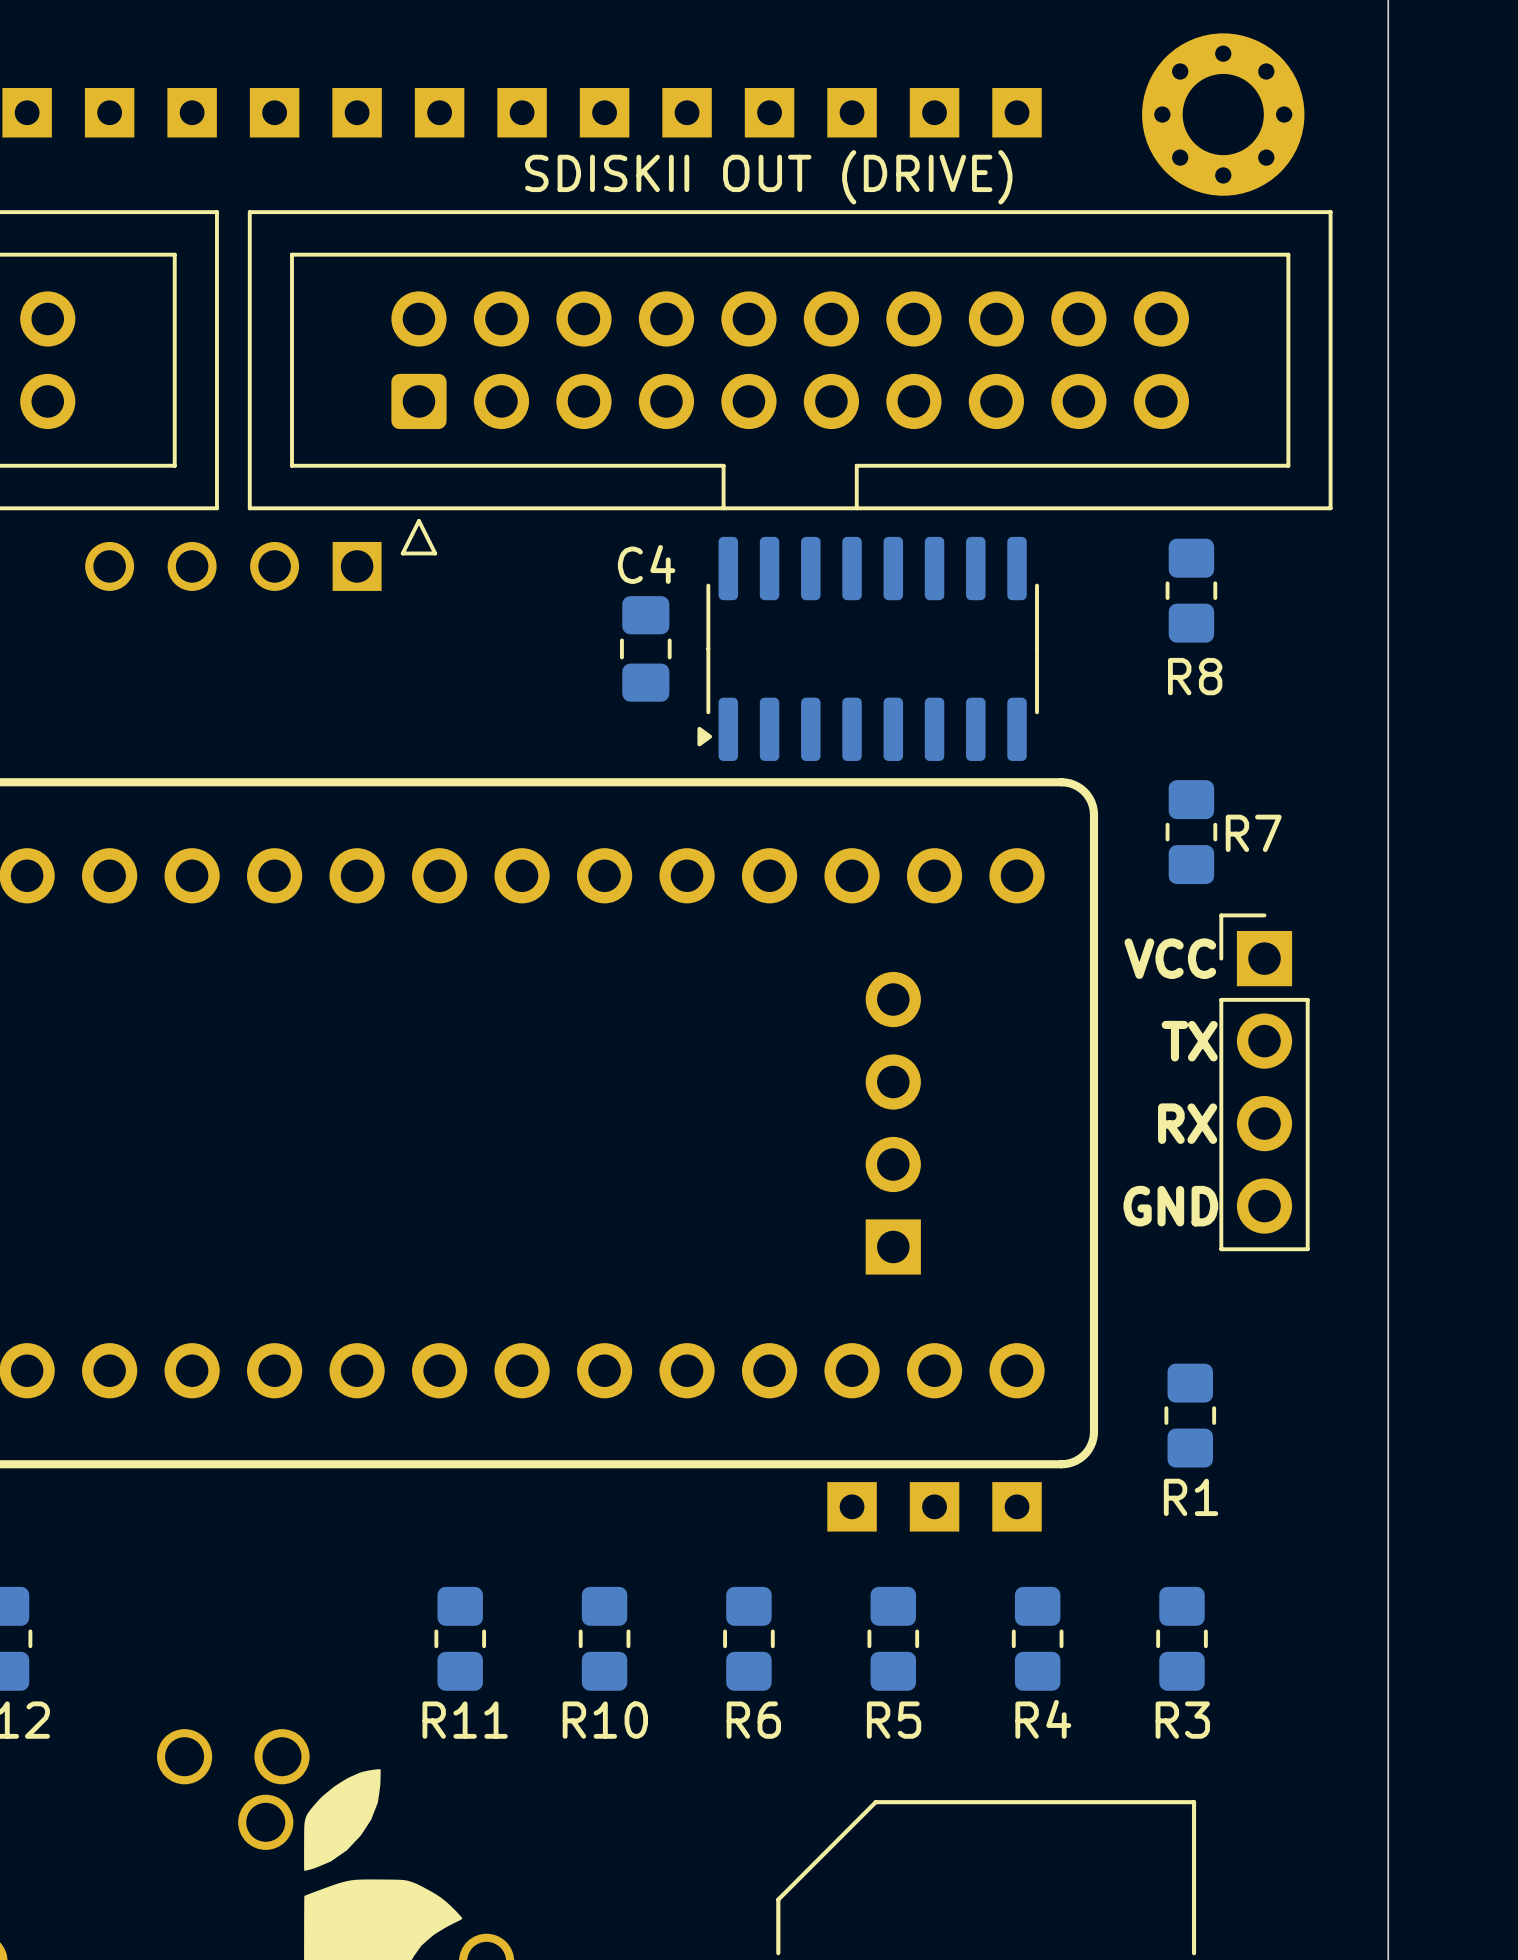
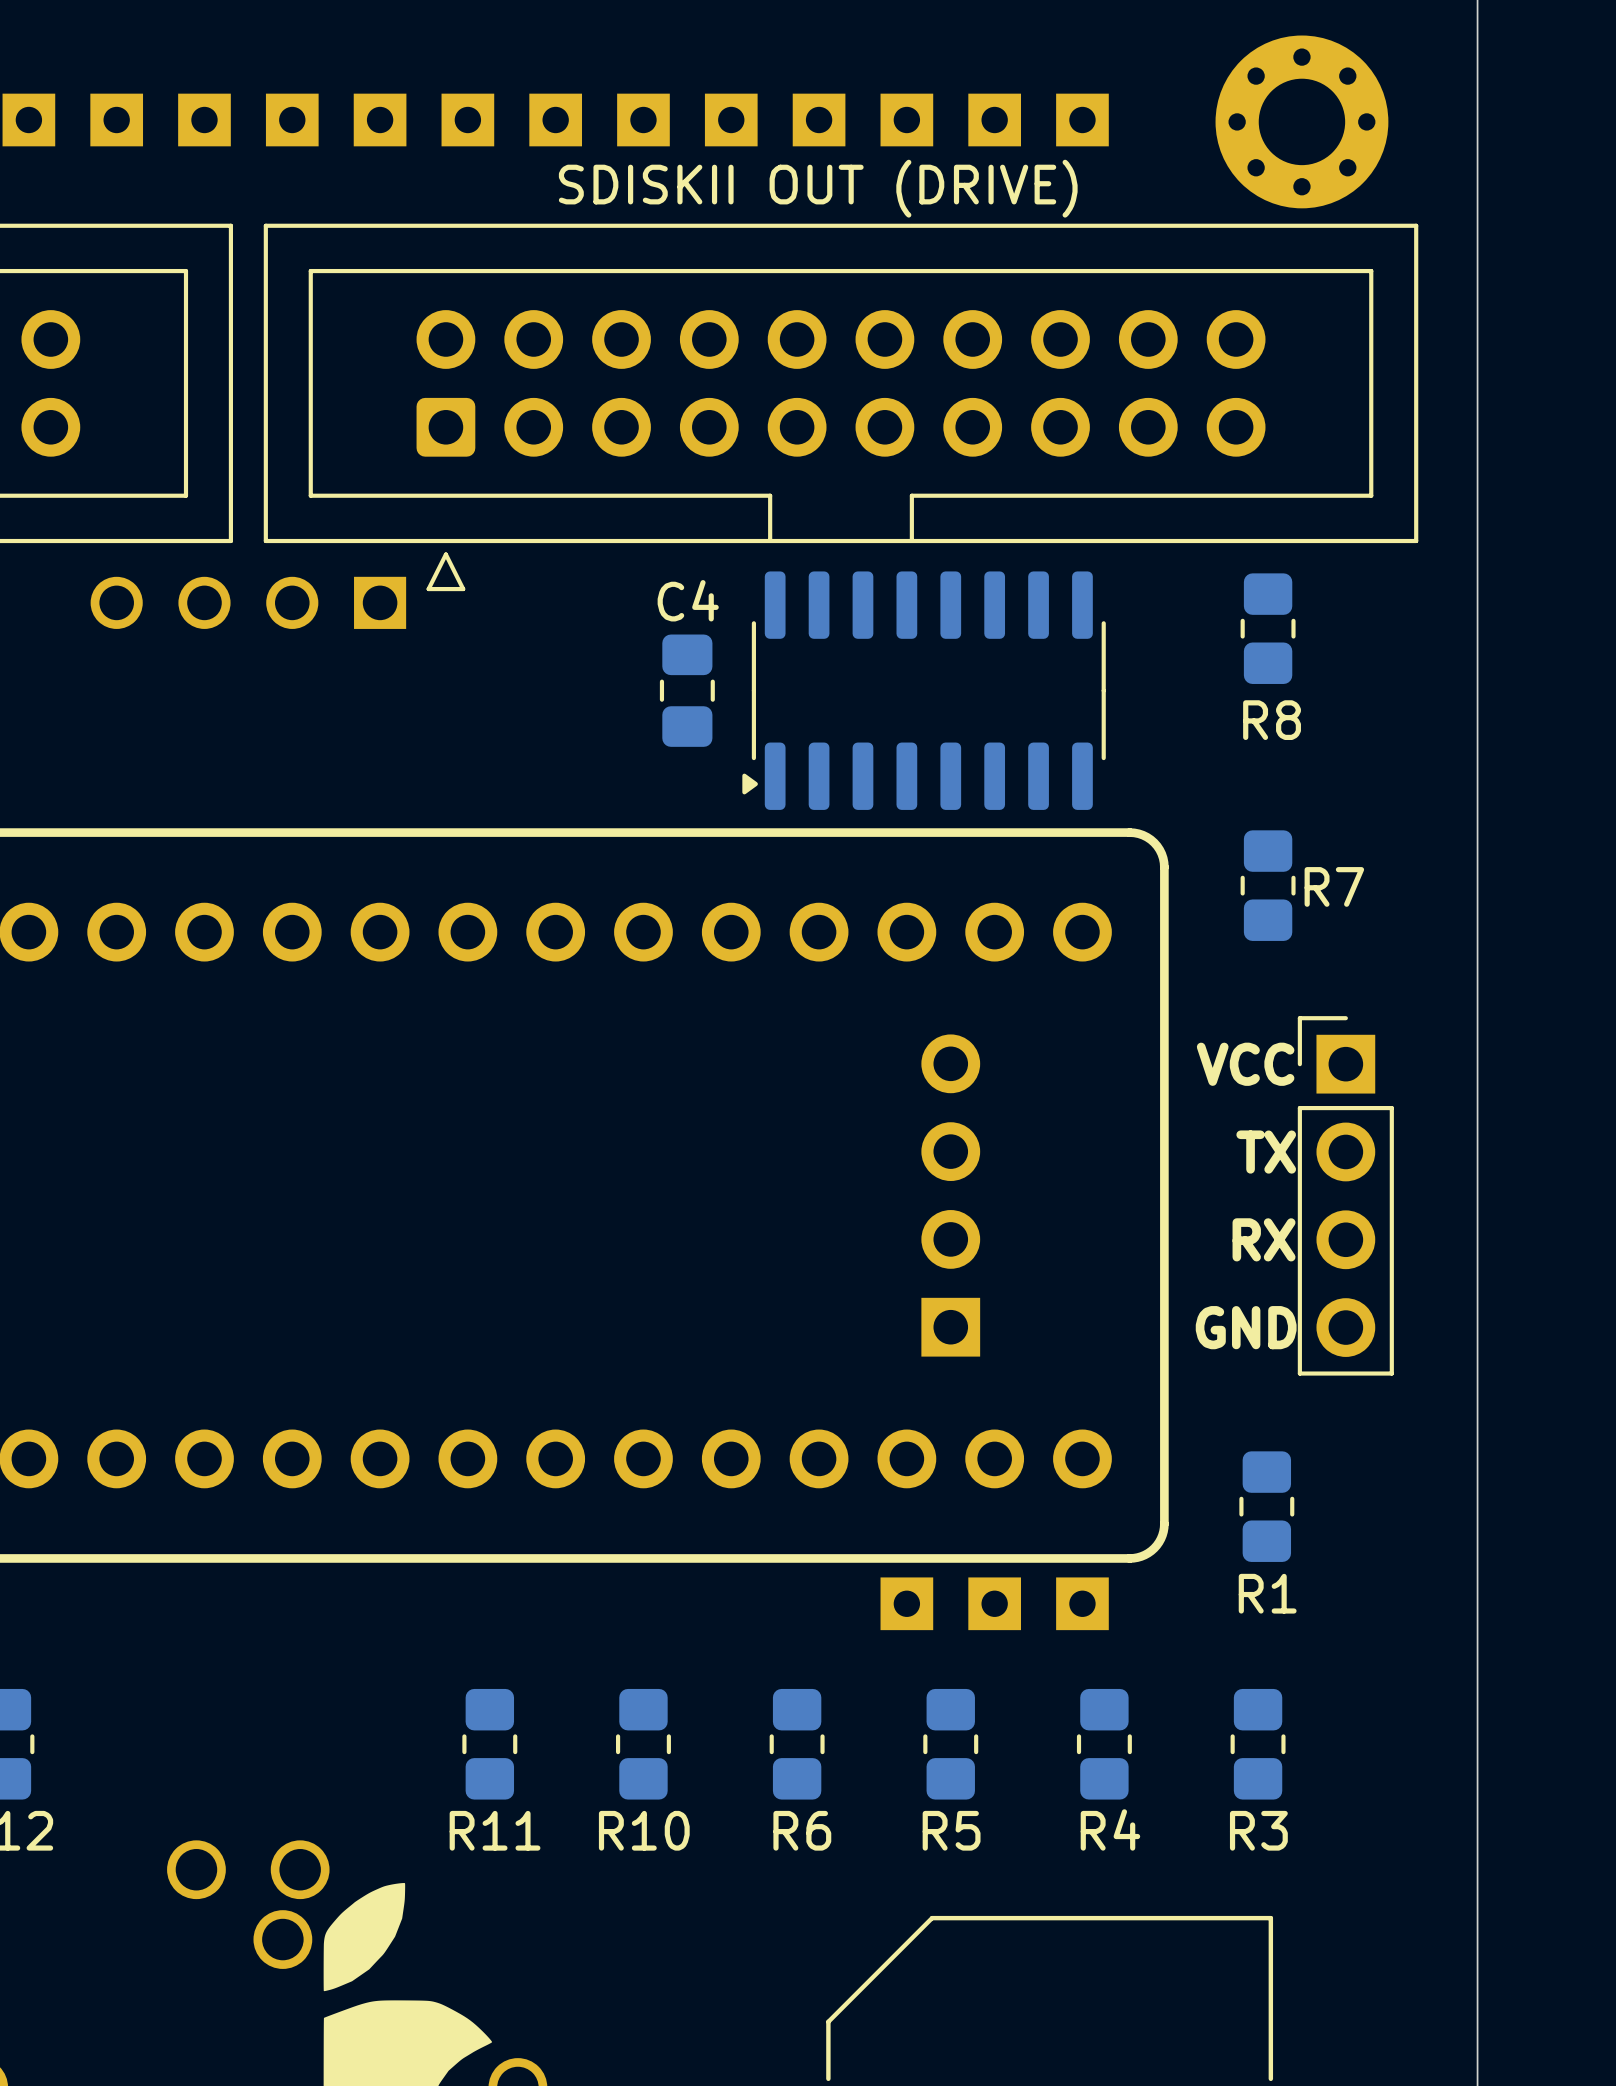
text position: VCC (1170, 958) -> VCC (1245, 1064)
text position: TX (1189, 1041) -> TX (1266, 1152)
part position: (1264, 1082) -> (1345, 1195)
text position: RX (1187, 1123) -> RX (1264, 1239)
text position: GND (1170, 1206) -> GND (1246, 1327)

